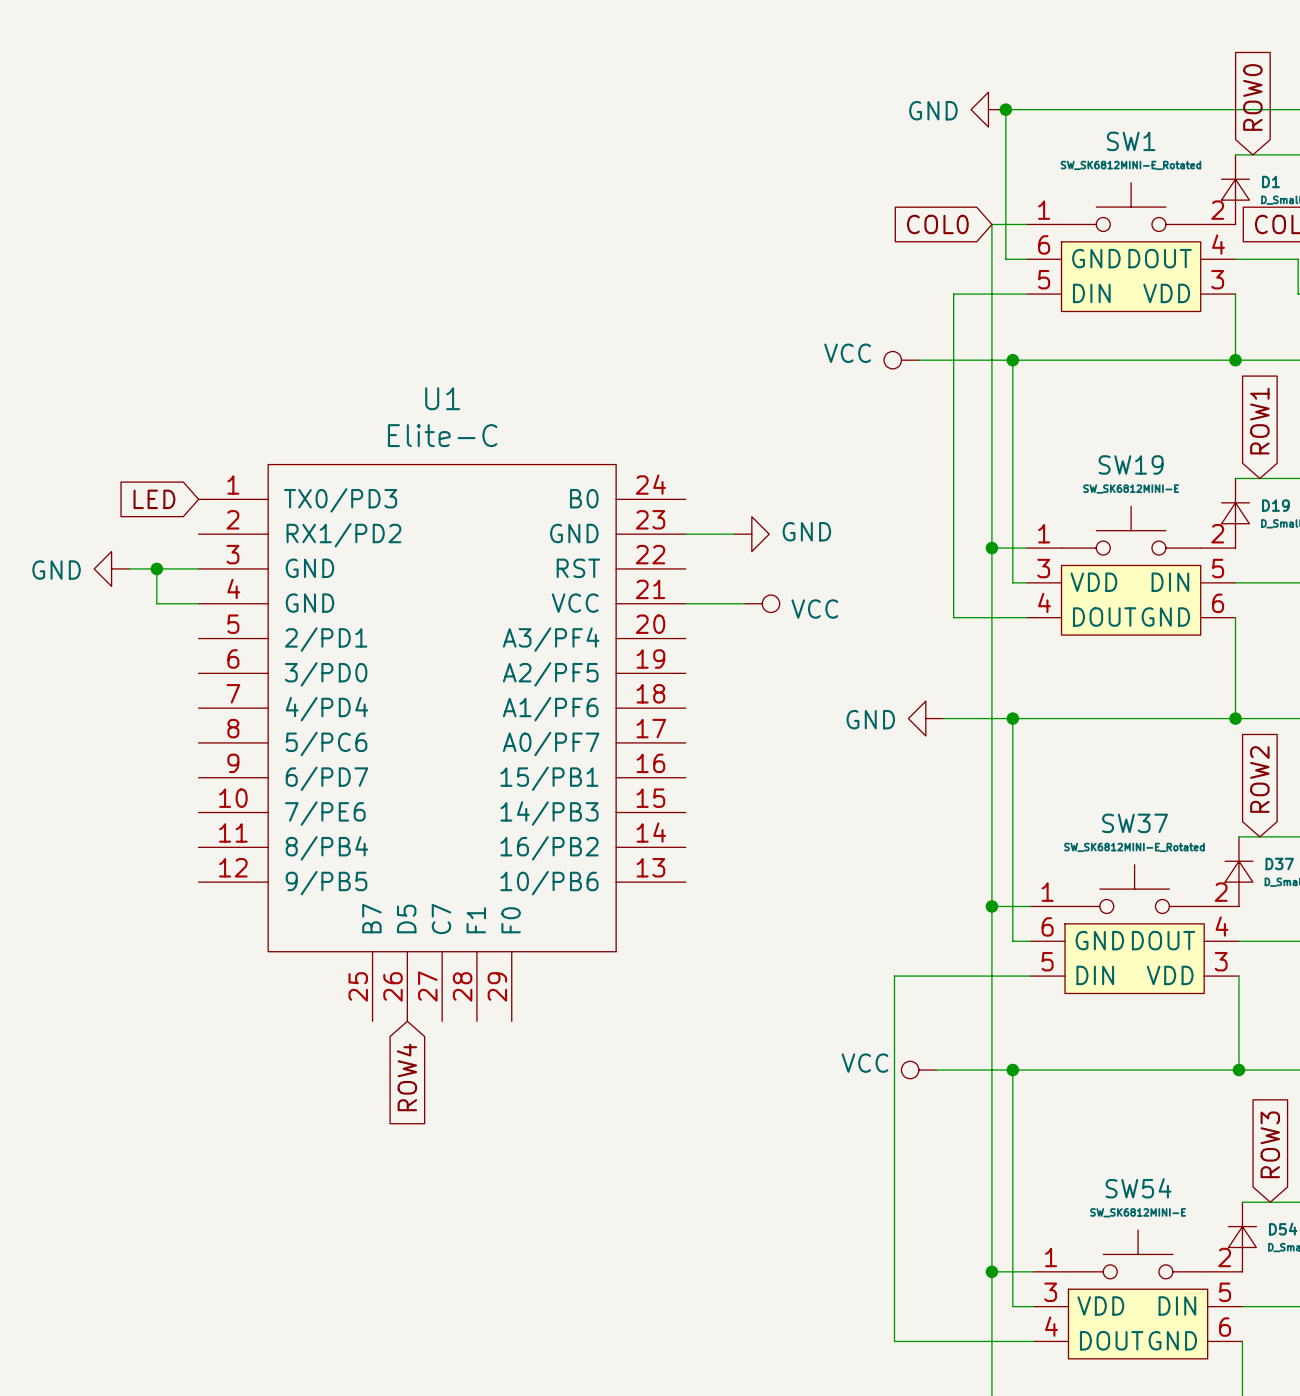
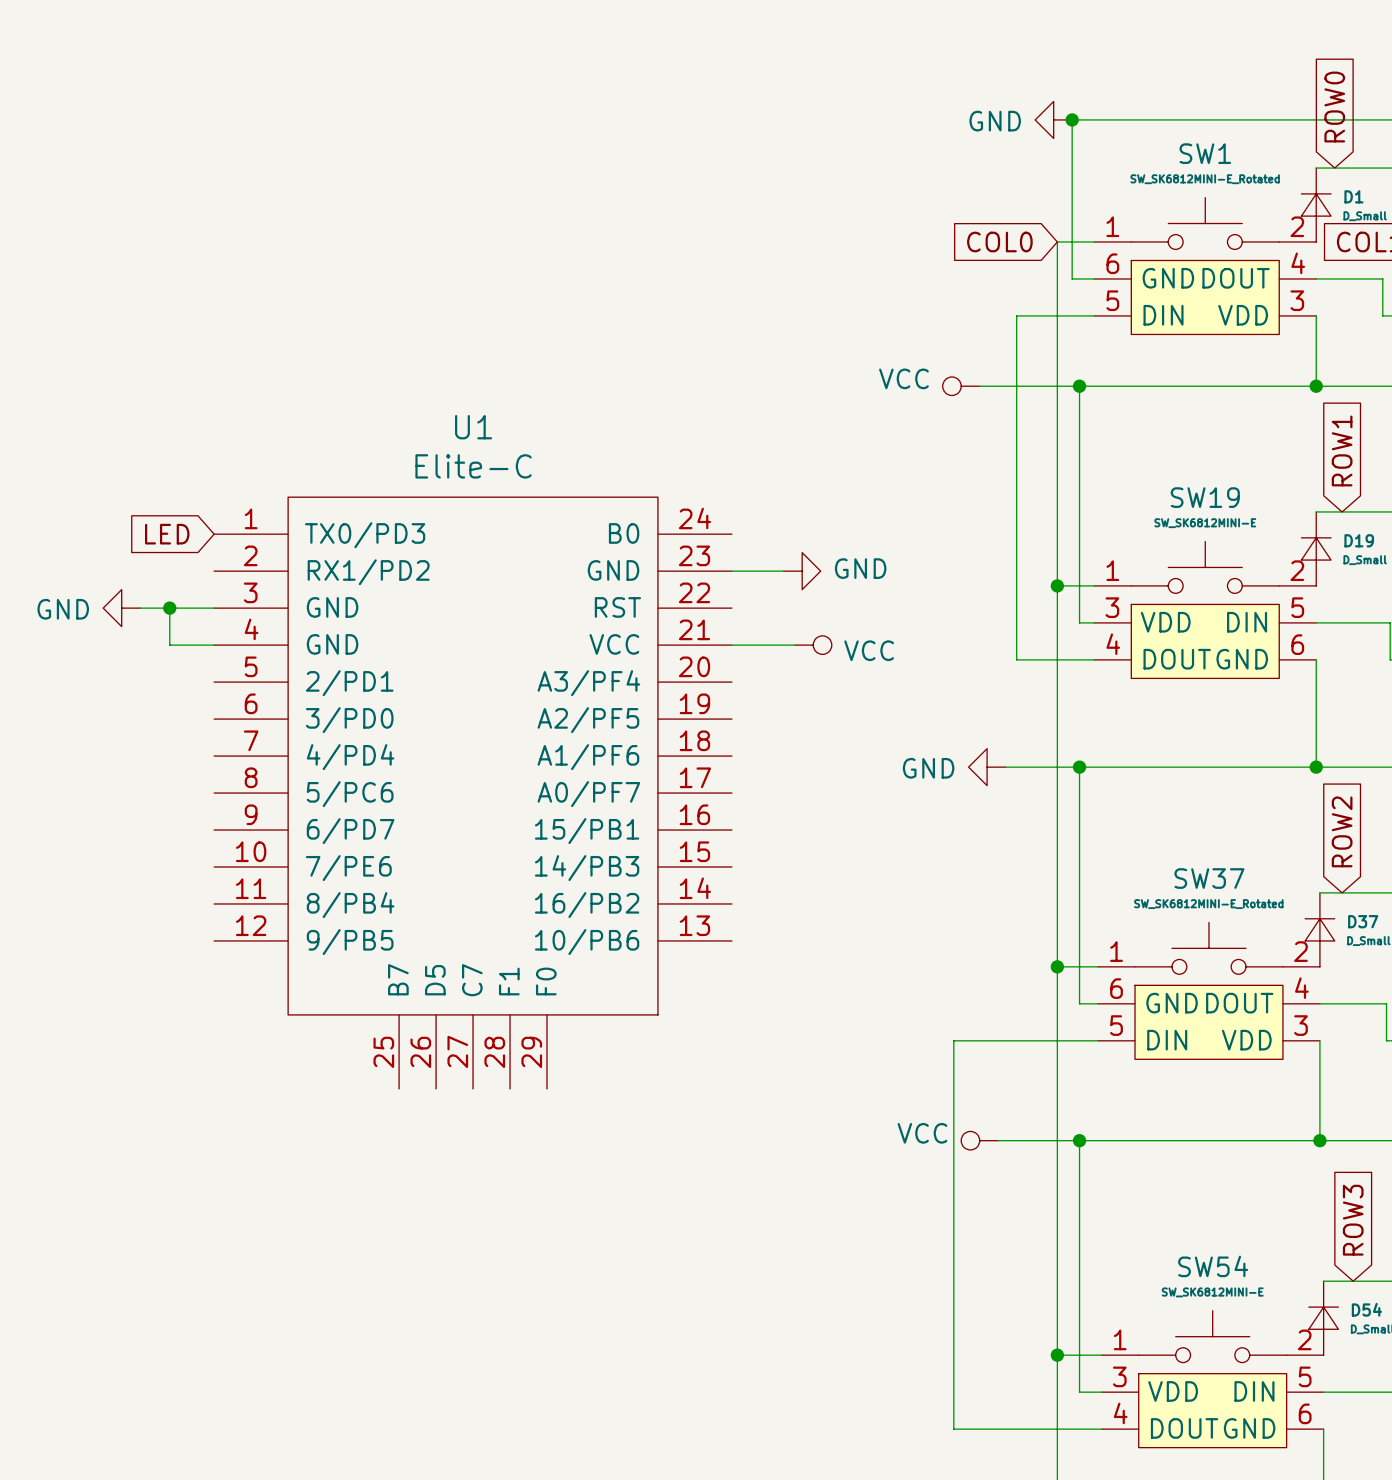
global label: ROW4 (406, 1077) -> none

